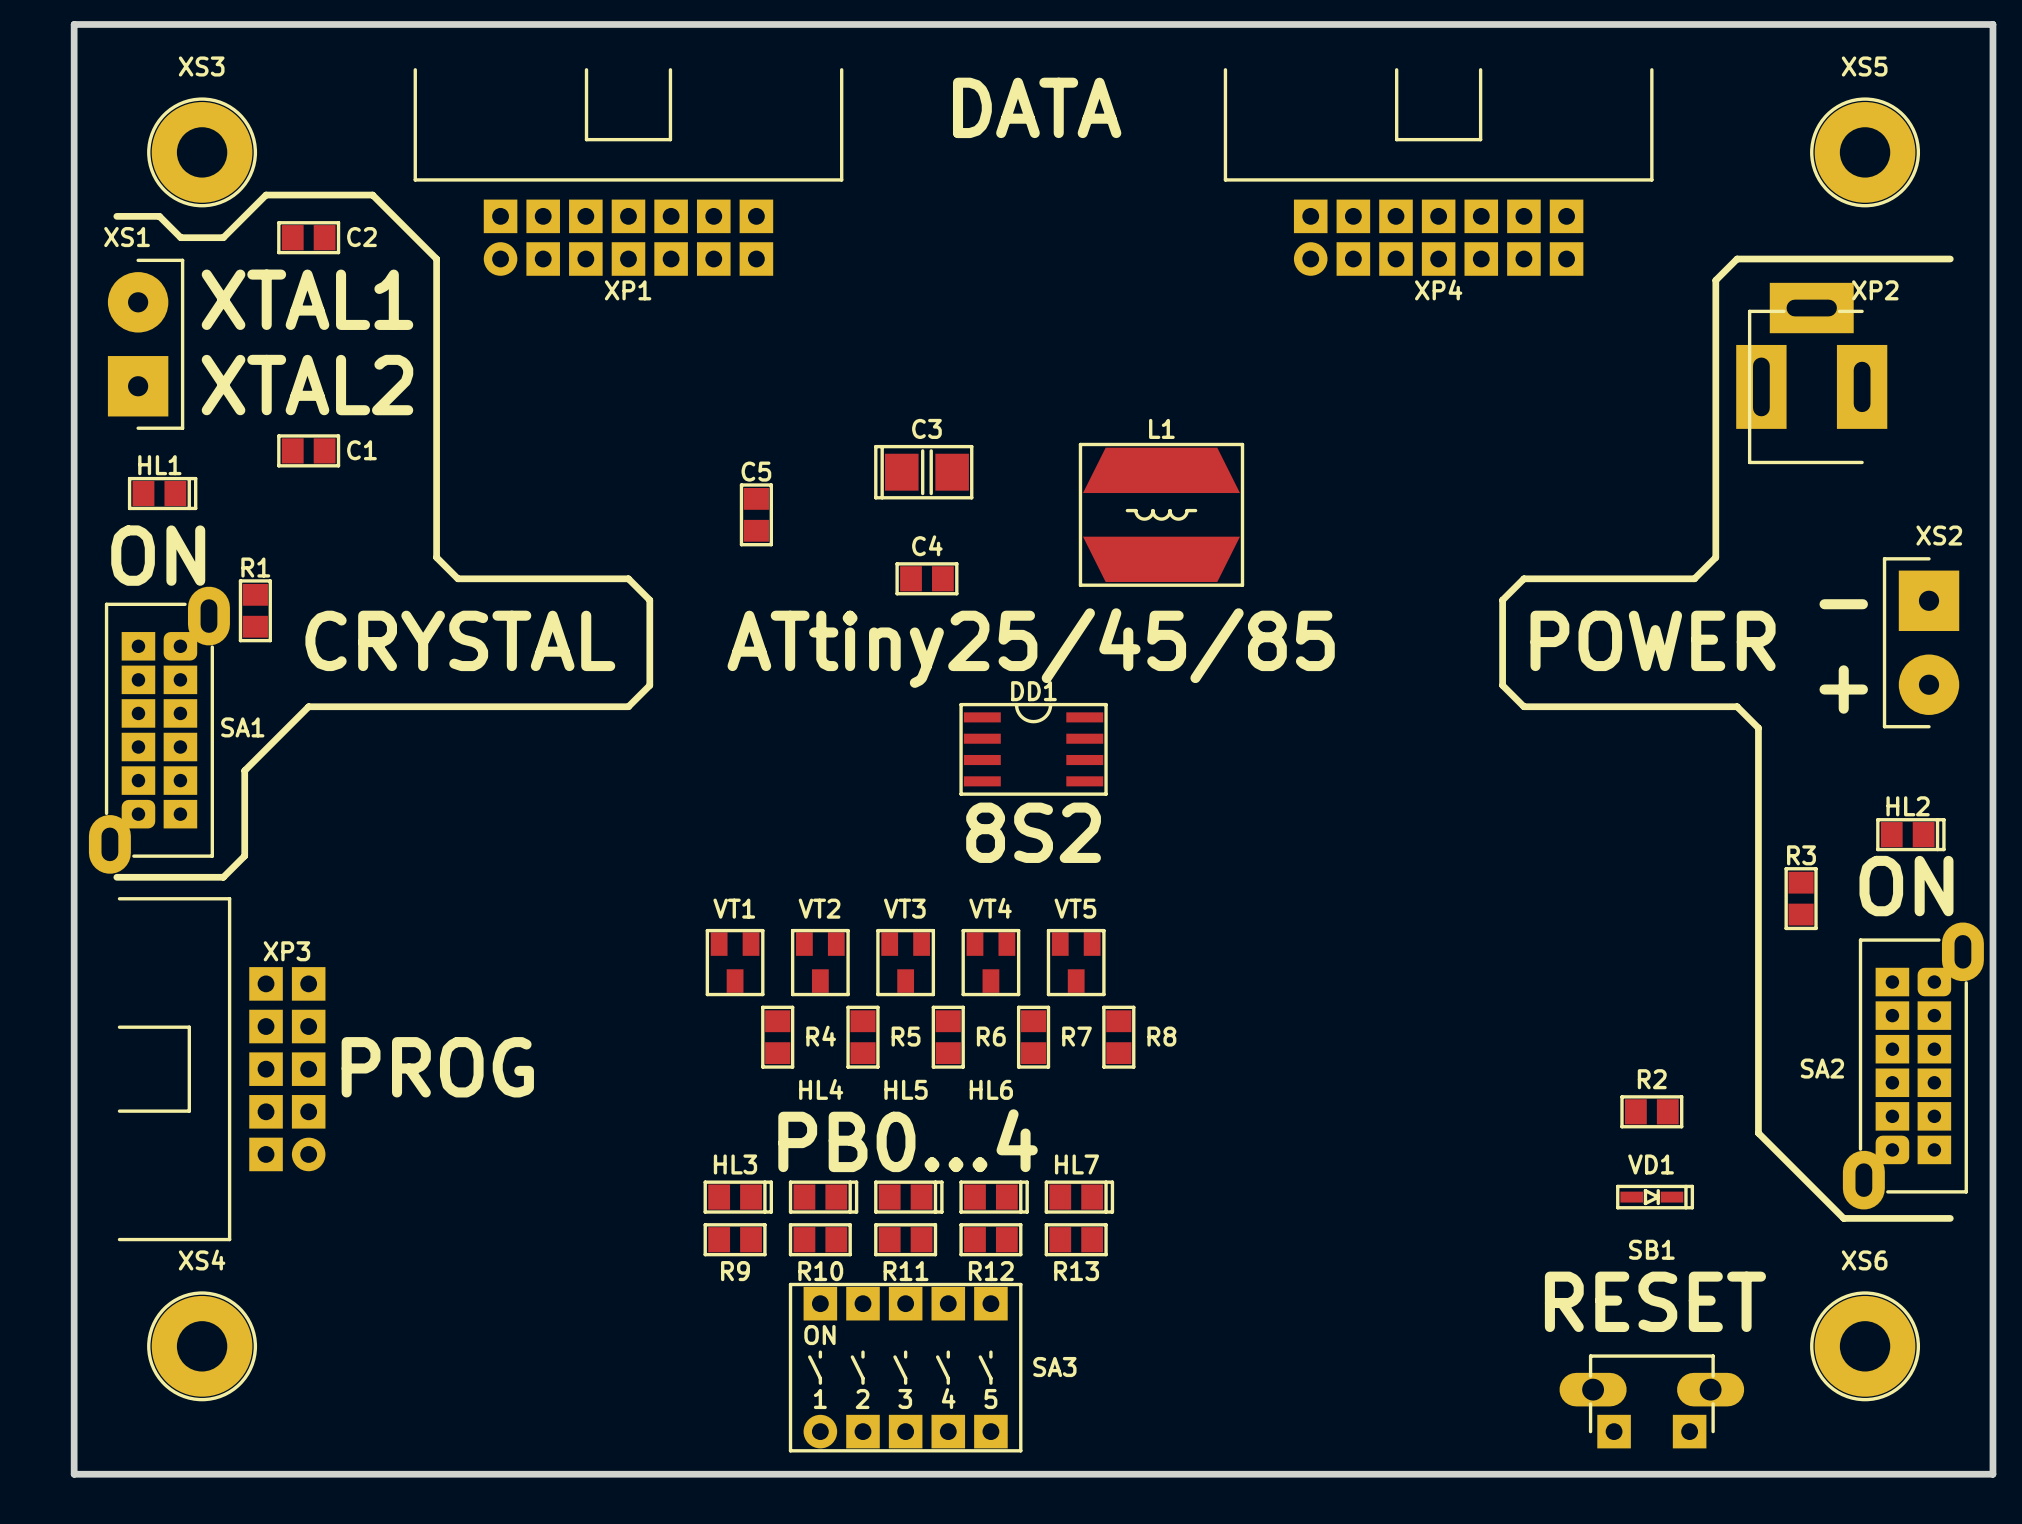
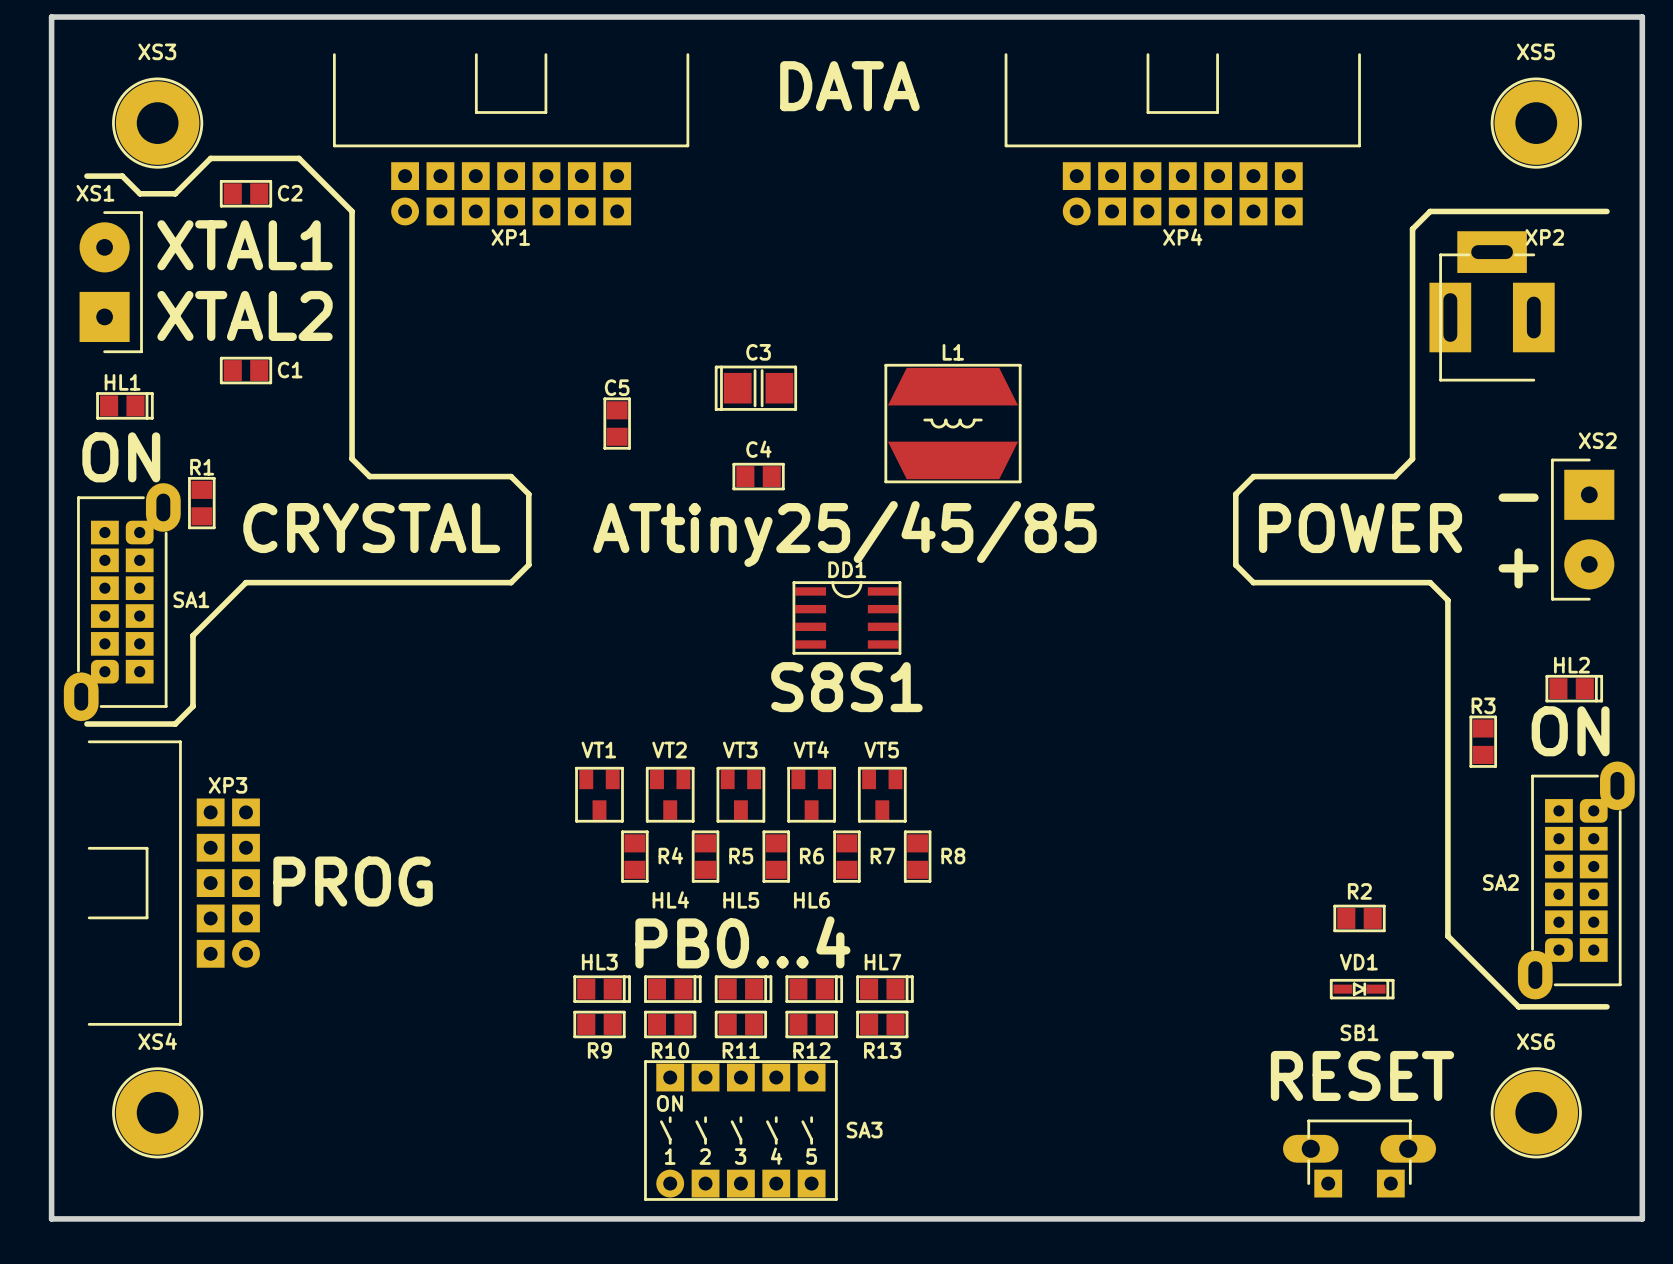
DD1 footprint: [959, 702, 1108, 796] -> [792, 581, 902, 655]
text: 8S2 (1033, 832) -> S8S1 (846, 687)

